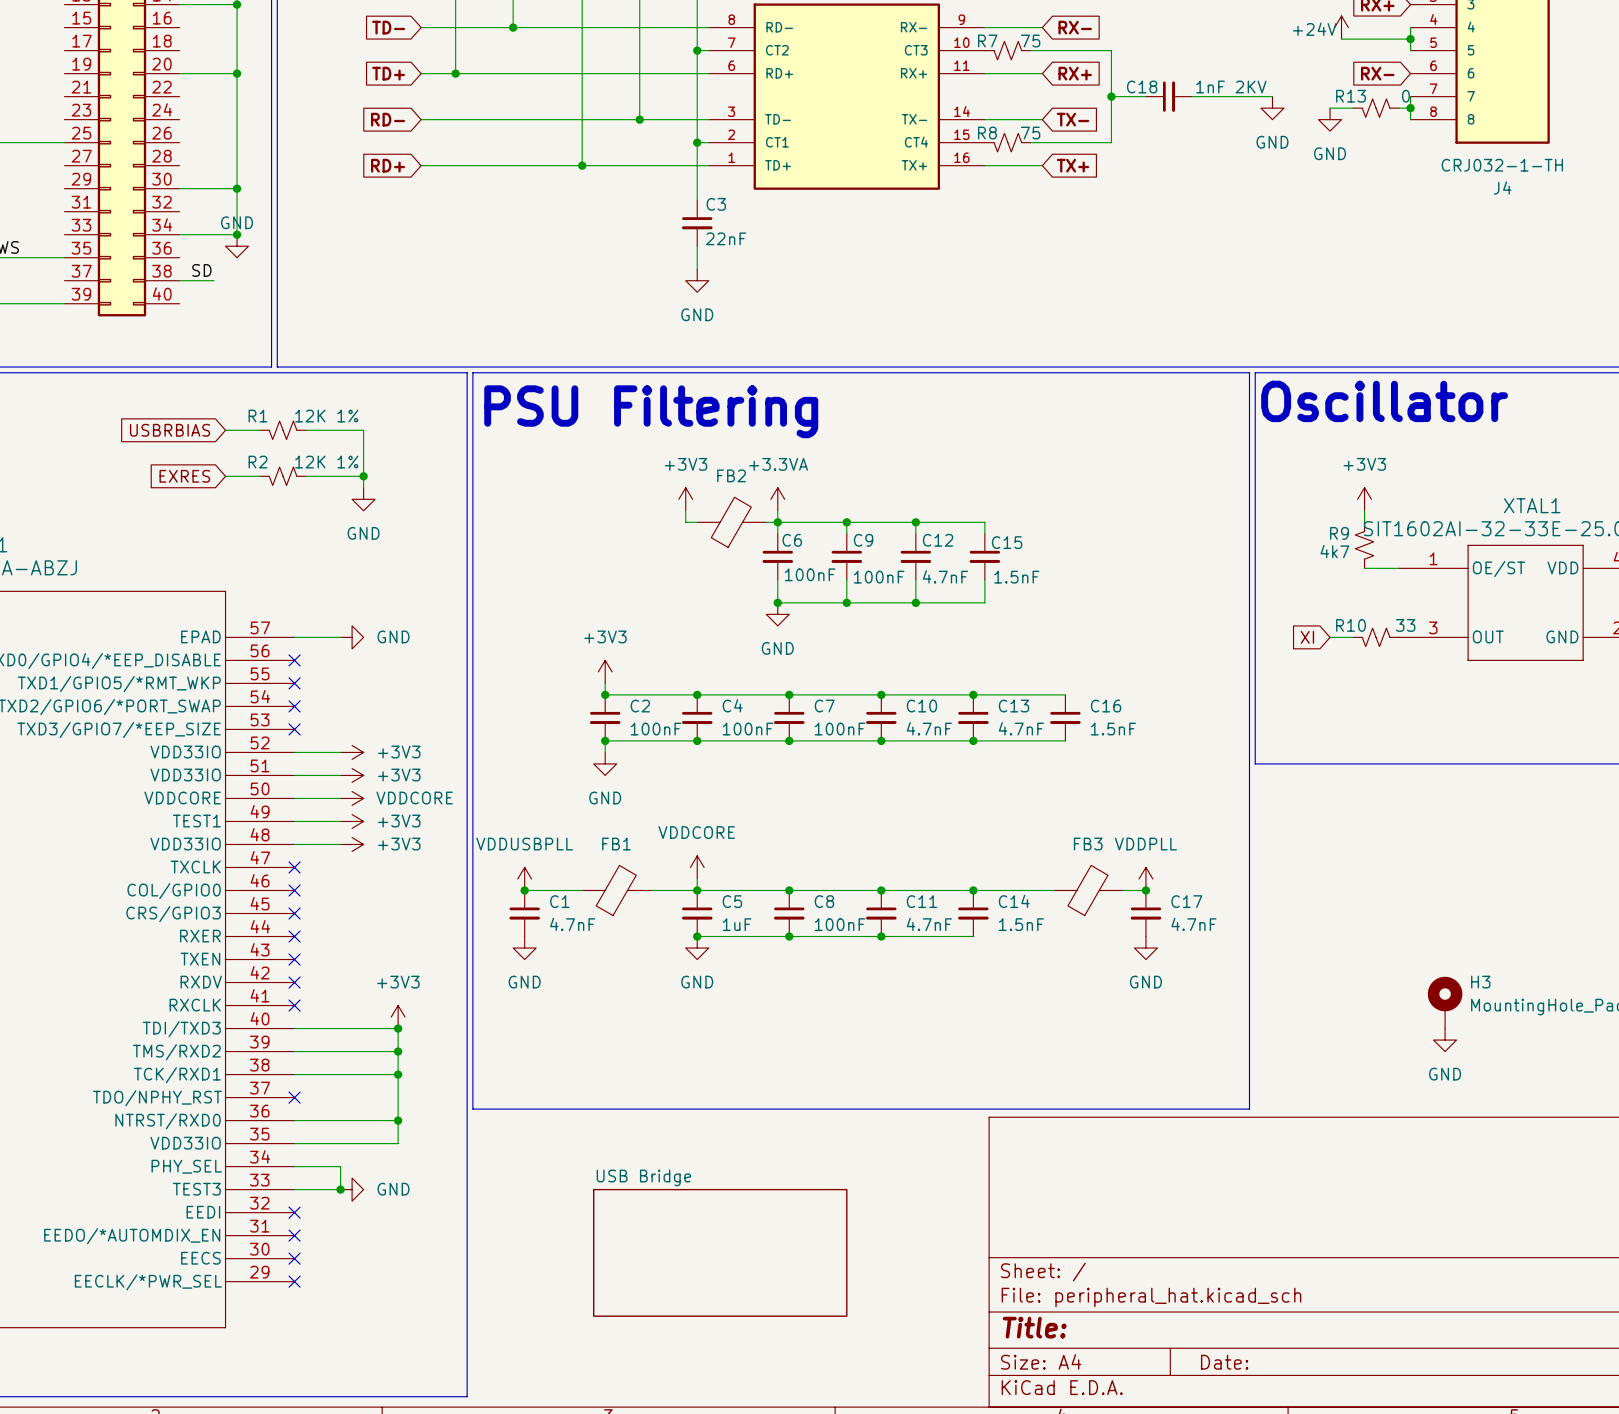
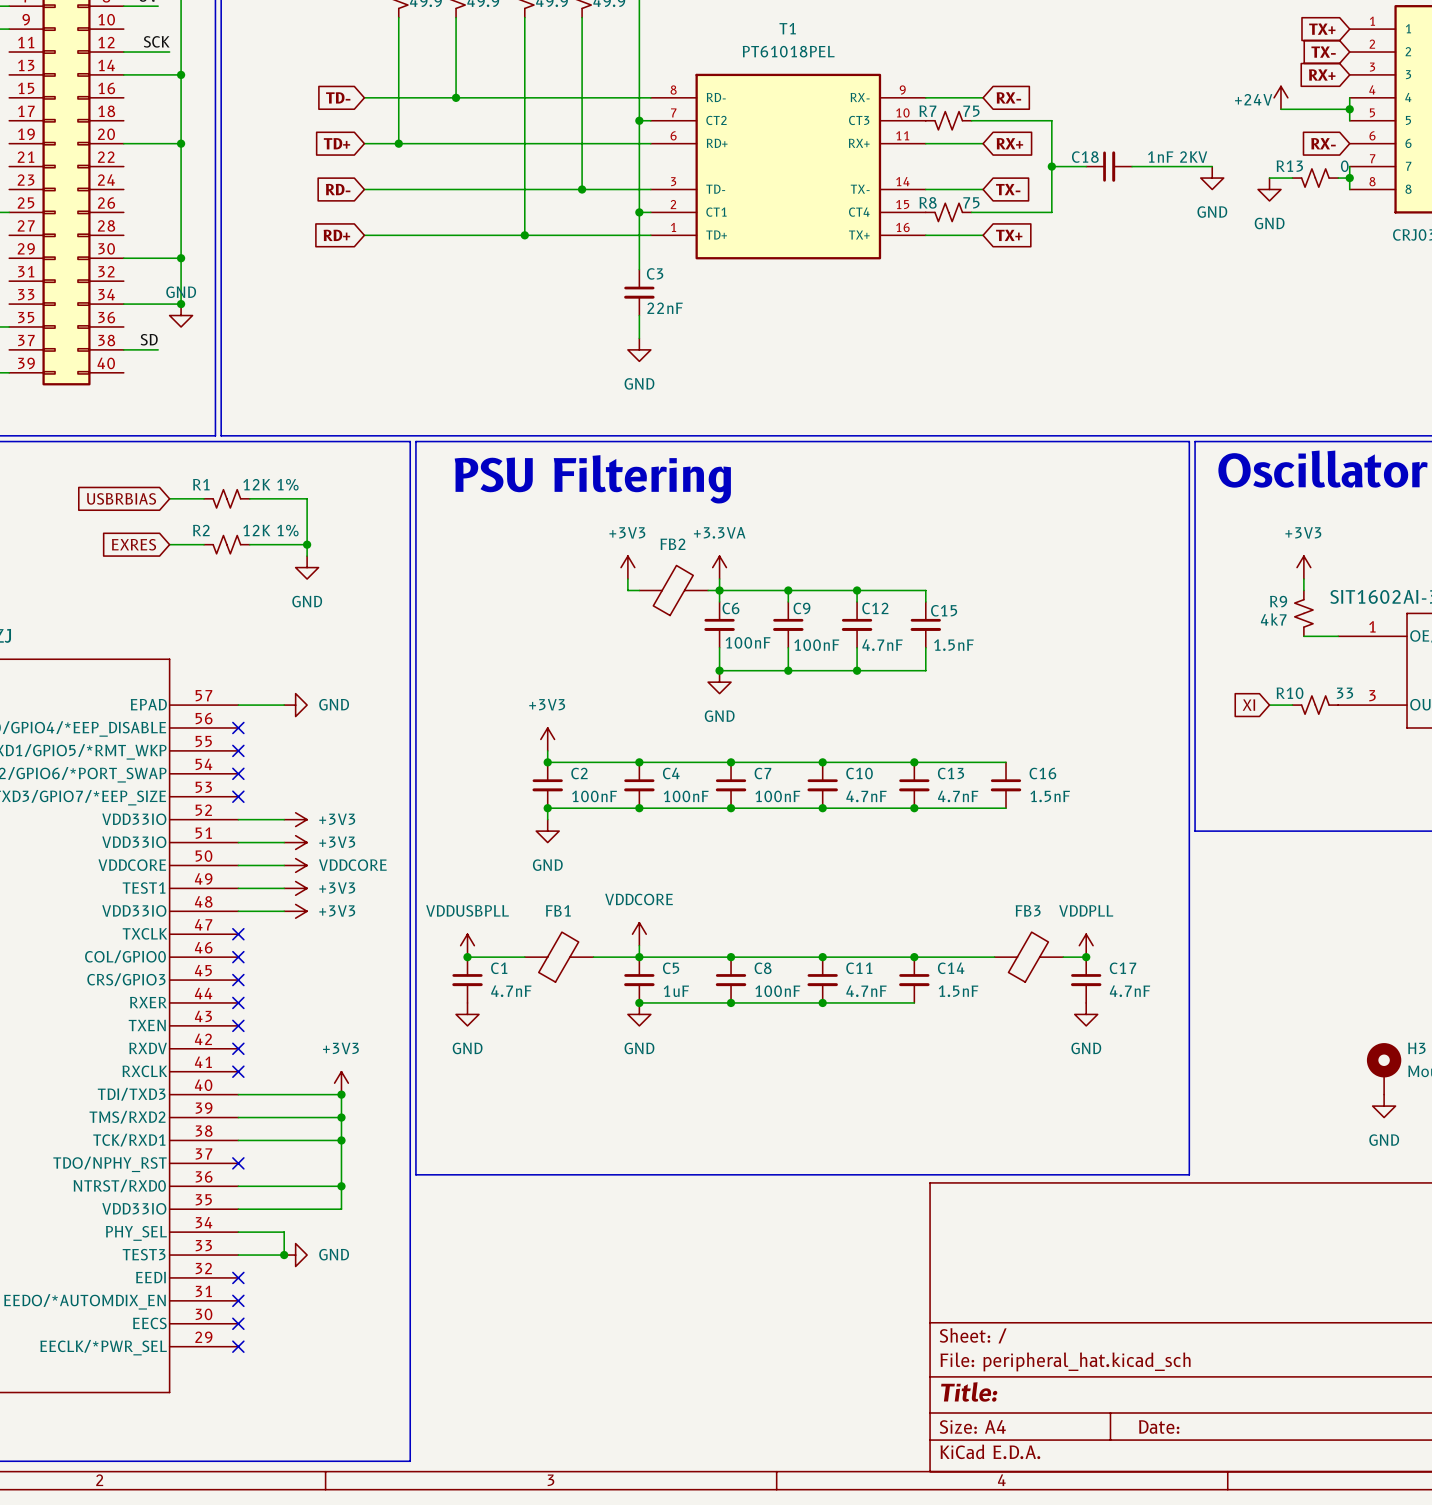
sheet USB Bridge: (720, 1252) -> none

